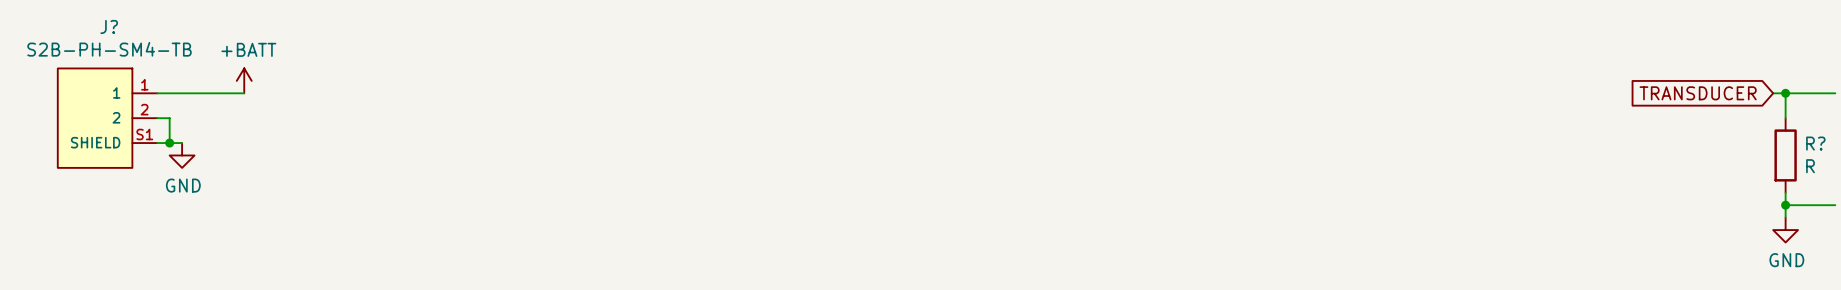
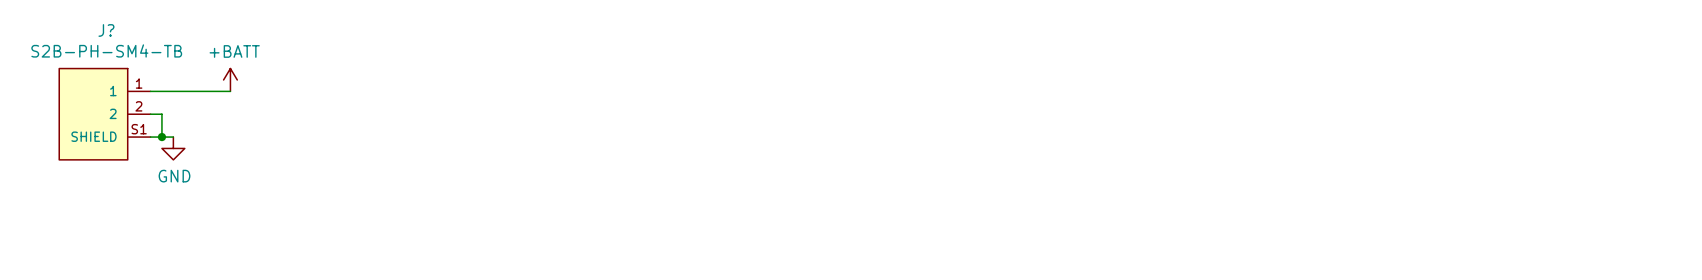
global label: TRANSDUCER (1698, 93) -> none
wire: (1773, 93) (1835, 93) -> none
wire: (1785, 93) (1785, 118) -> none
junction: (1785, 93) -> none
R?: R (1785, 155) -> none
wire: (1785, 192) (1785, 217) -> none
wire: (1785, 205) (1835, 205) -> none
junction: (1785, 205) -> none
power symbol: GND (1785, 230) -> none

